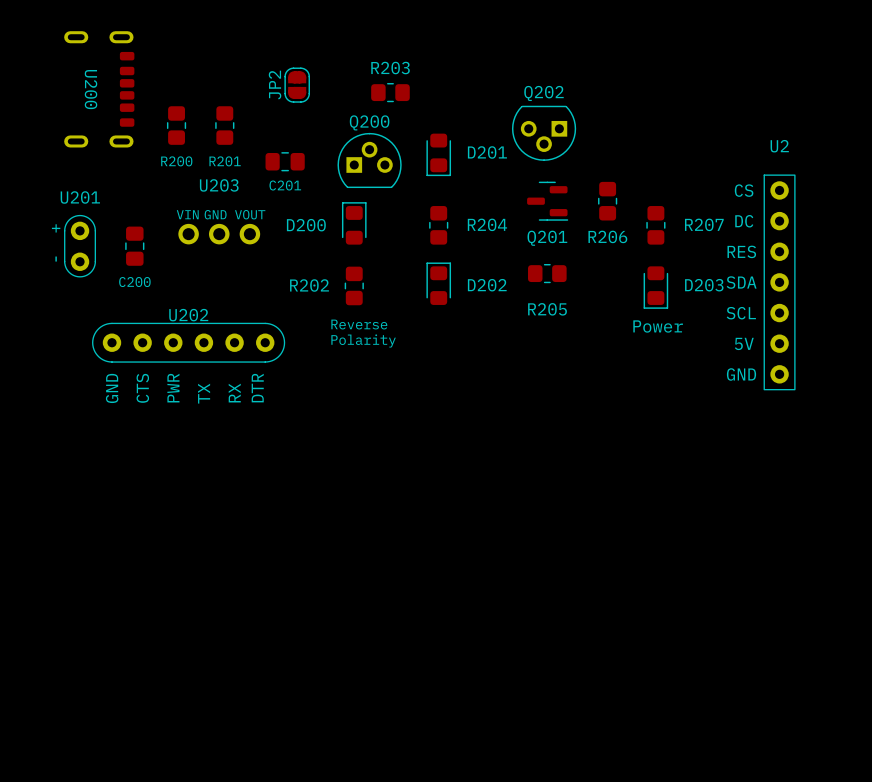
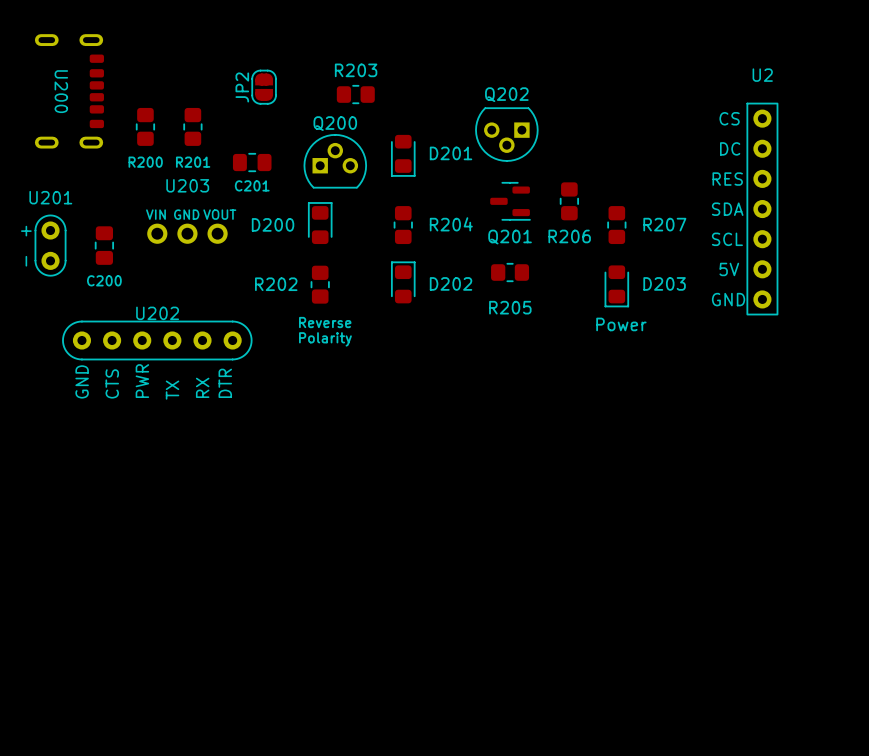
U2 position: (779, 282) -> (762, 209)

